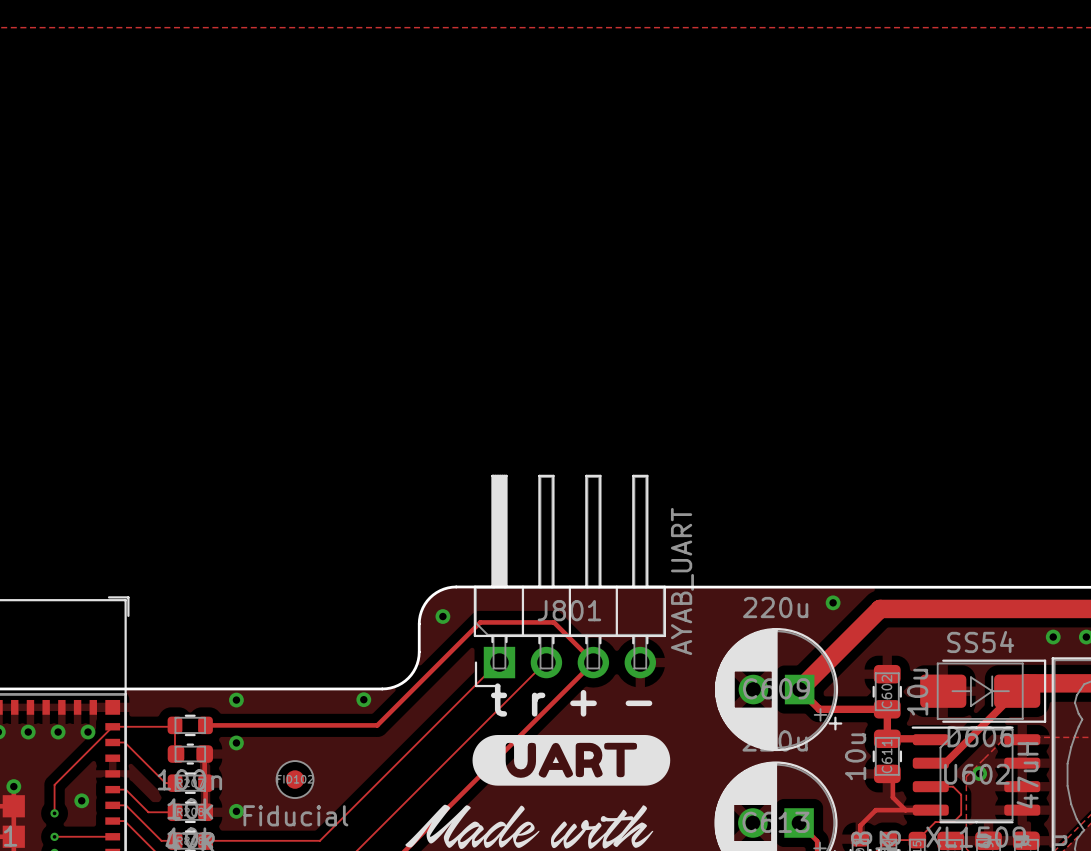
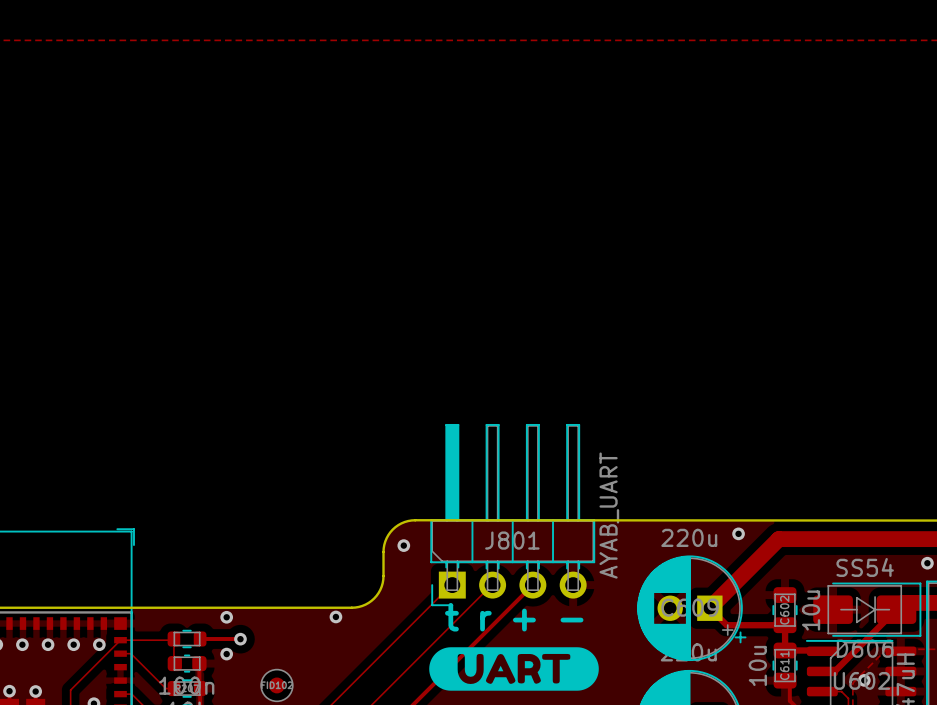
track: (593, 662) (553, 622) (480, 622) (377, 725) (252, 725) -> none
via: none -> (240, 639)

